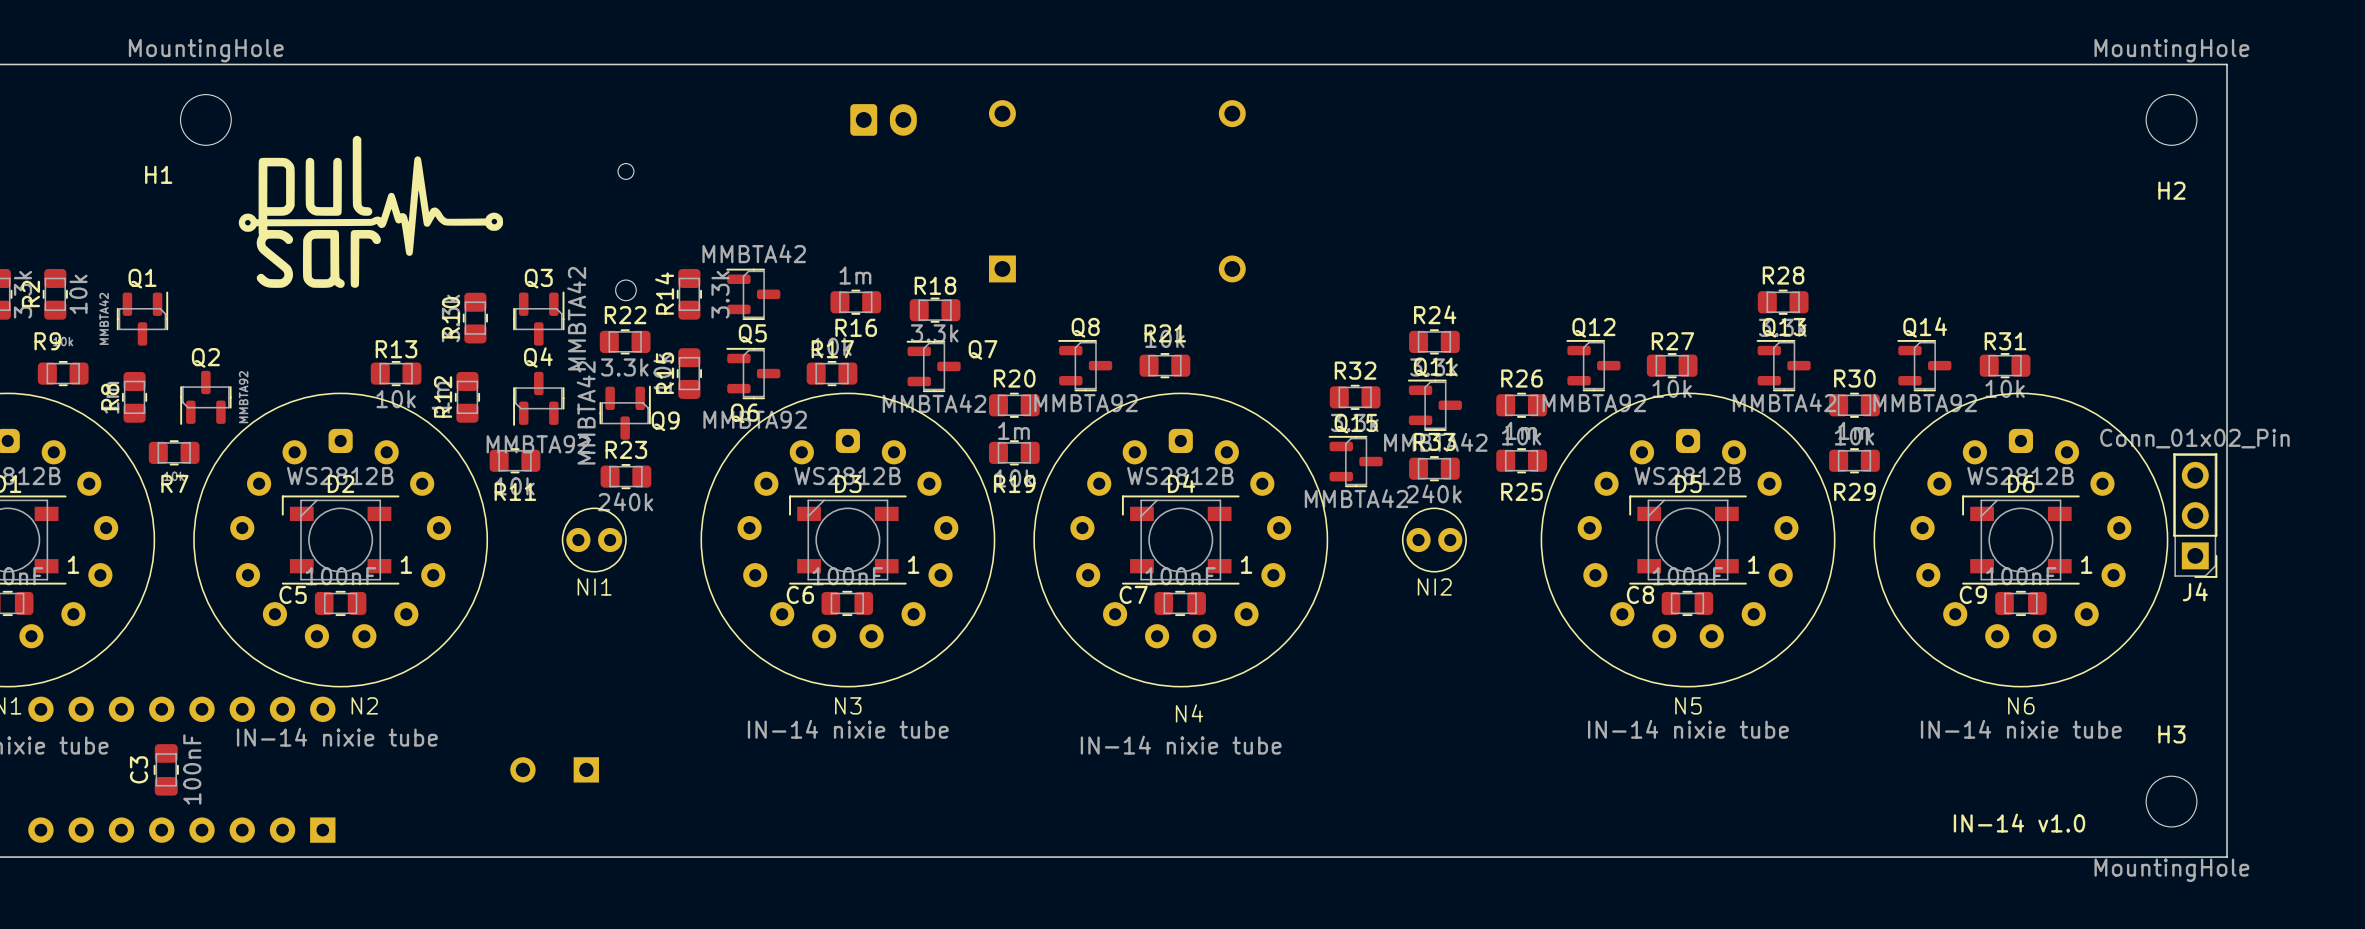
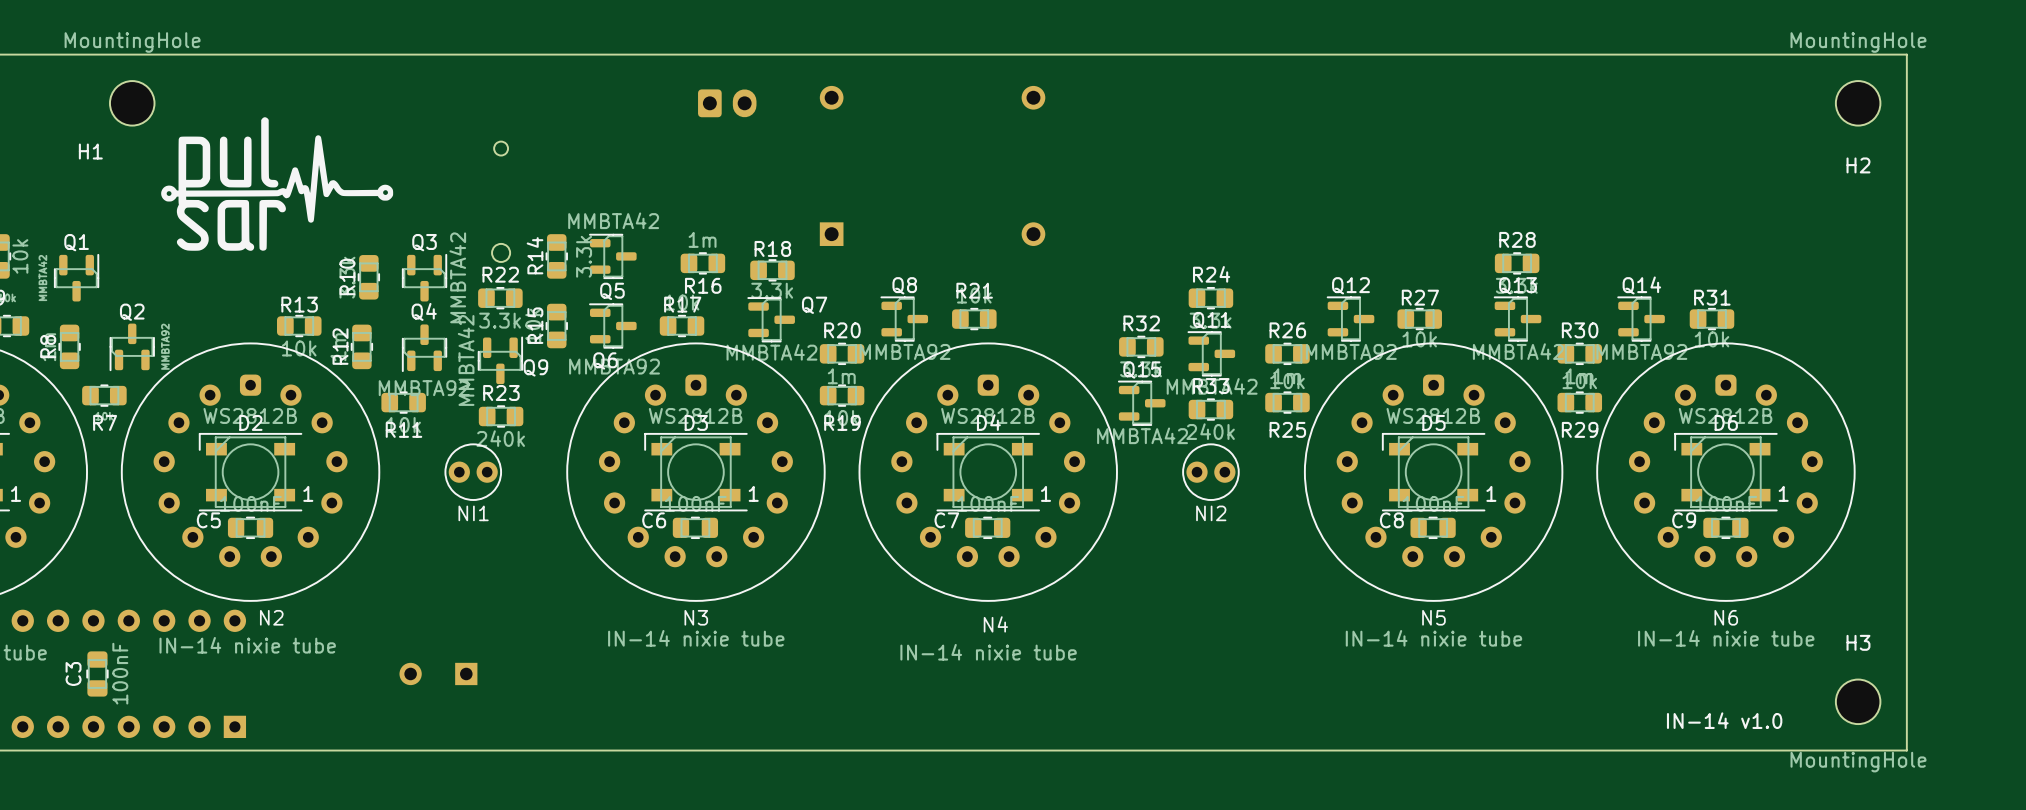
J4: Conn_01x02_Pin (2195, 515) -> none

